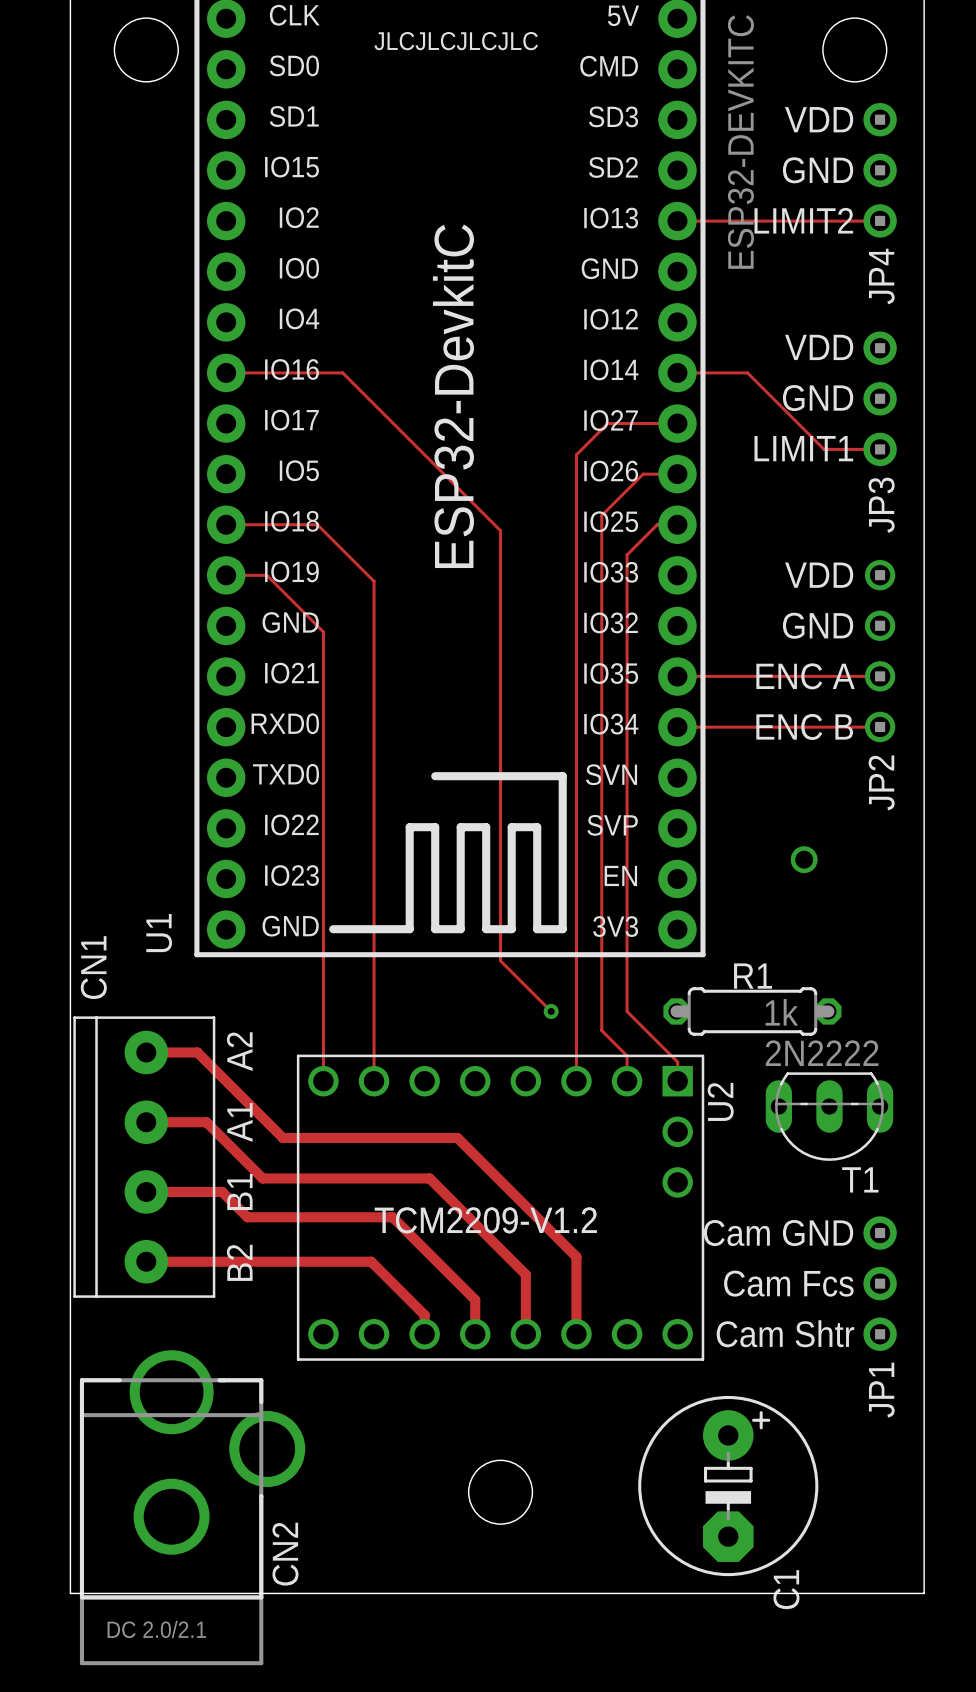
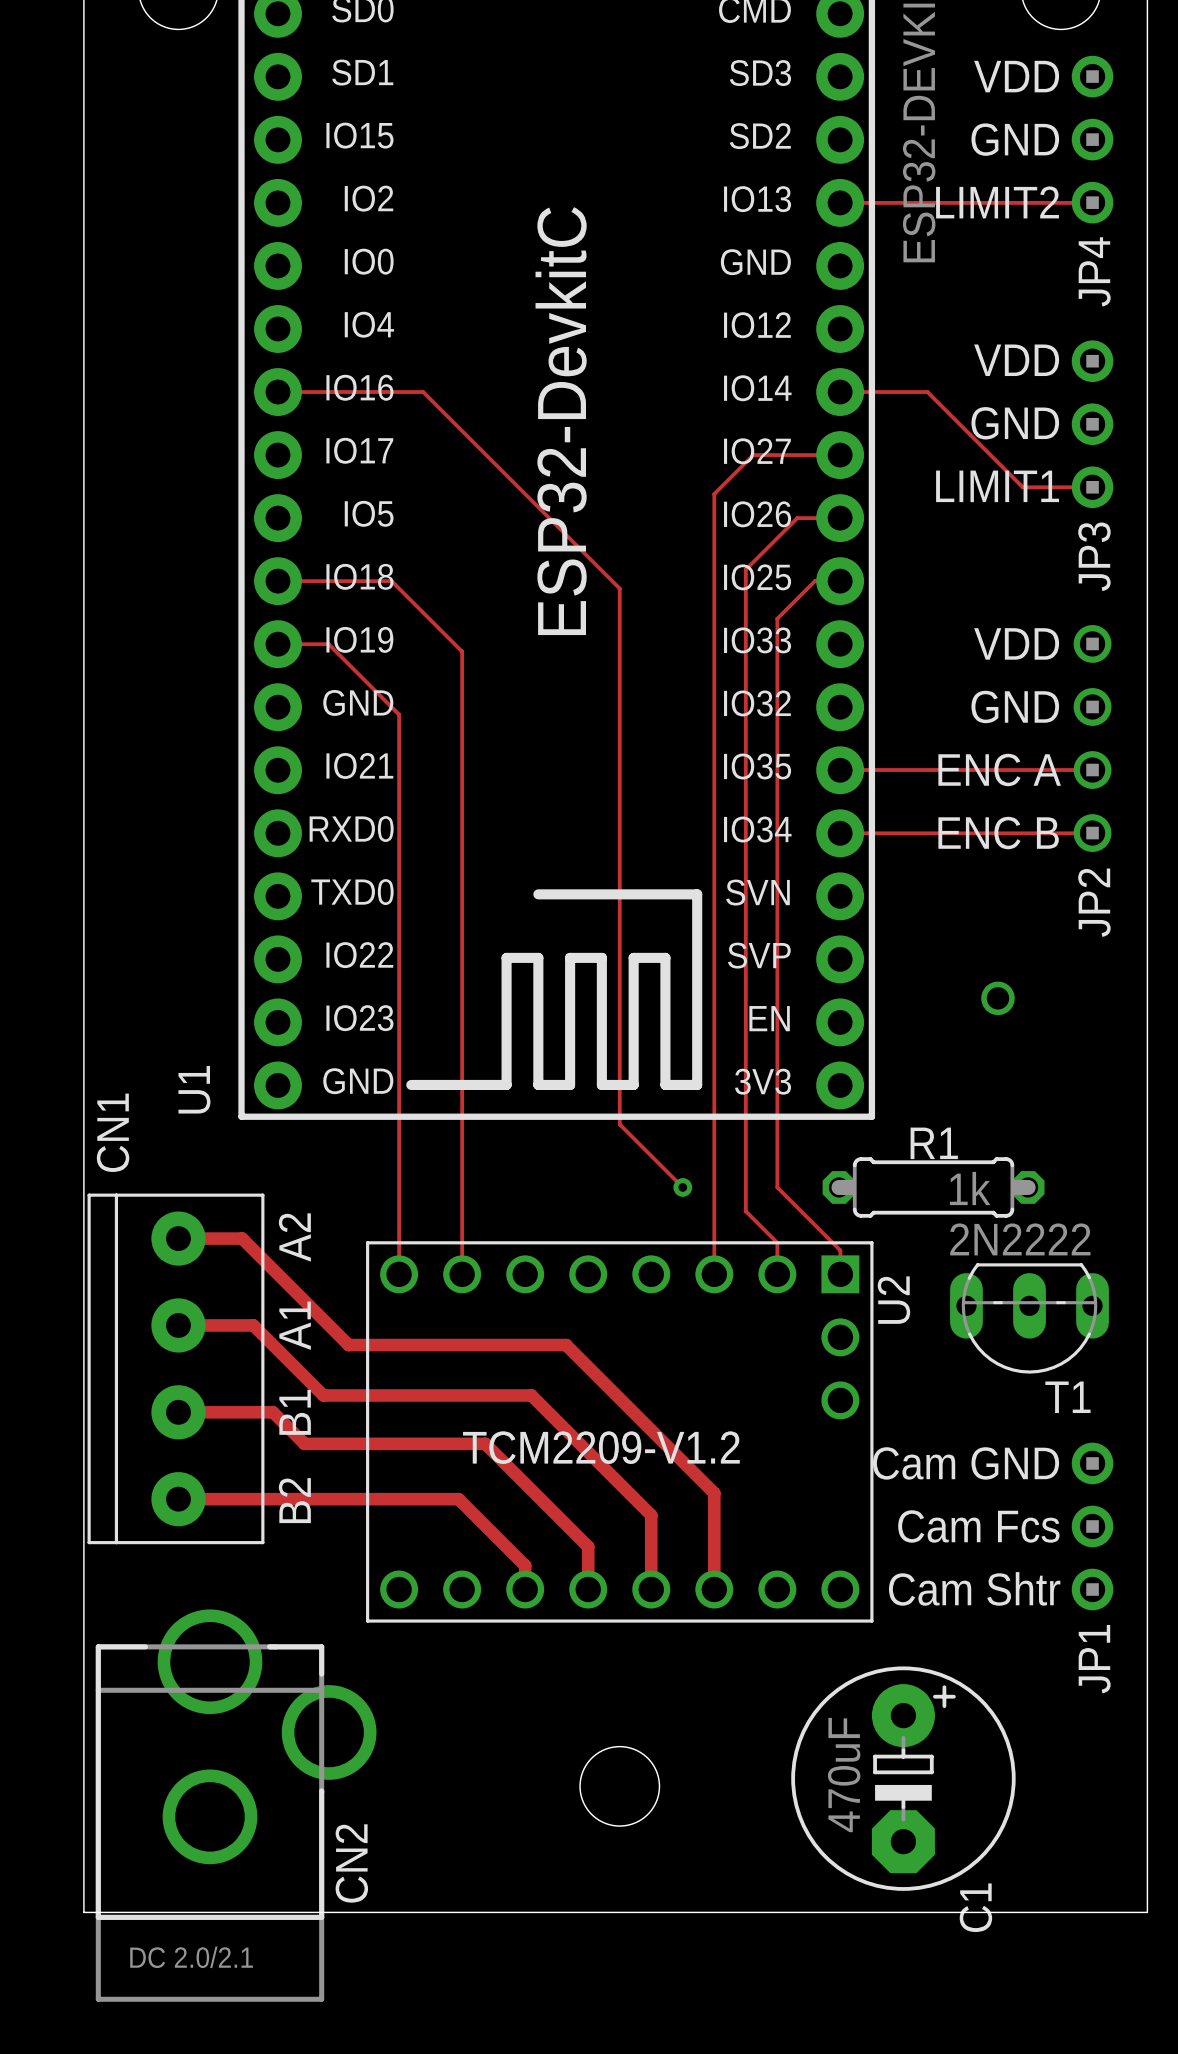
C1 value: none -> 470uF (844, 1775)

